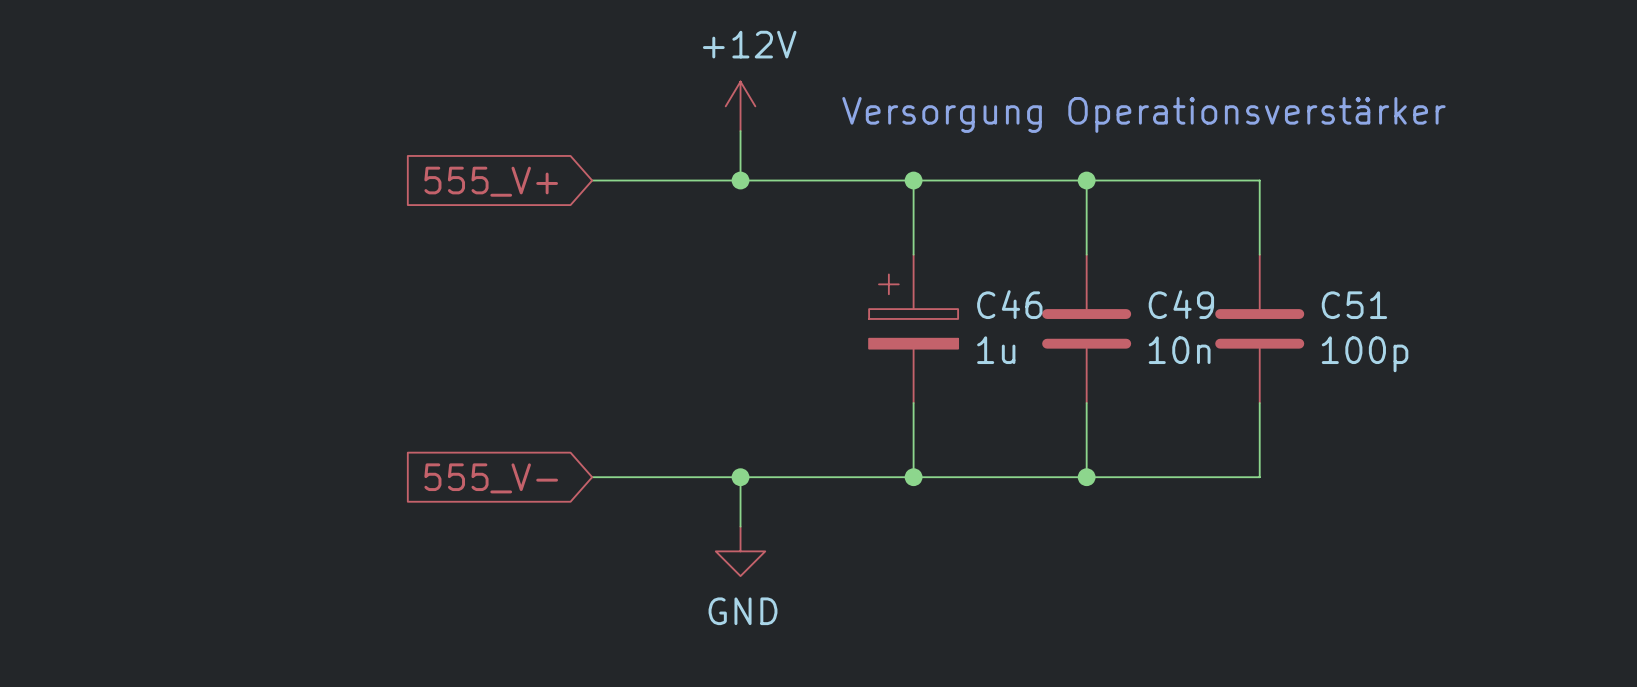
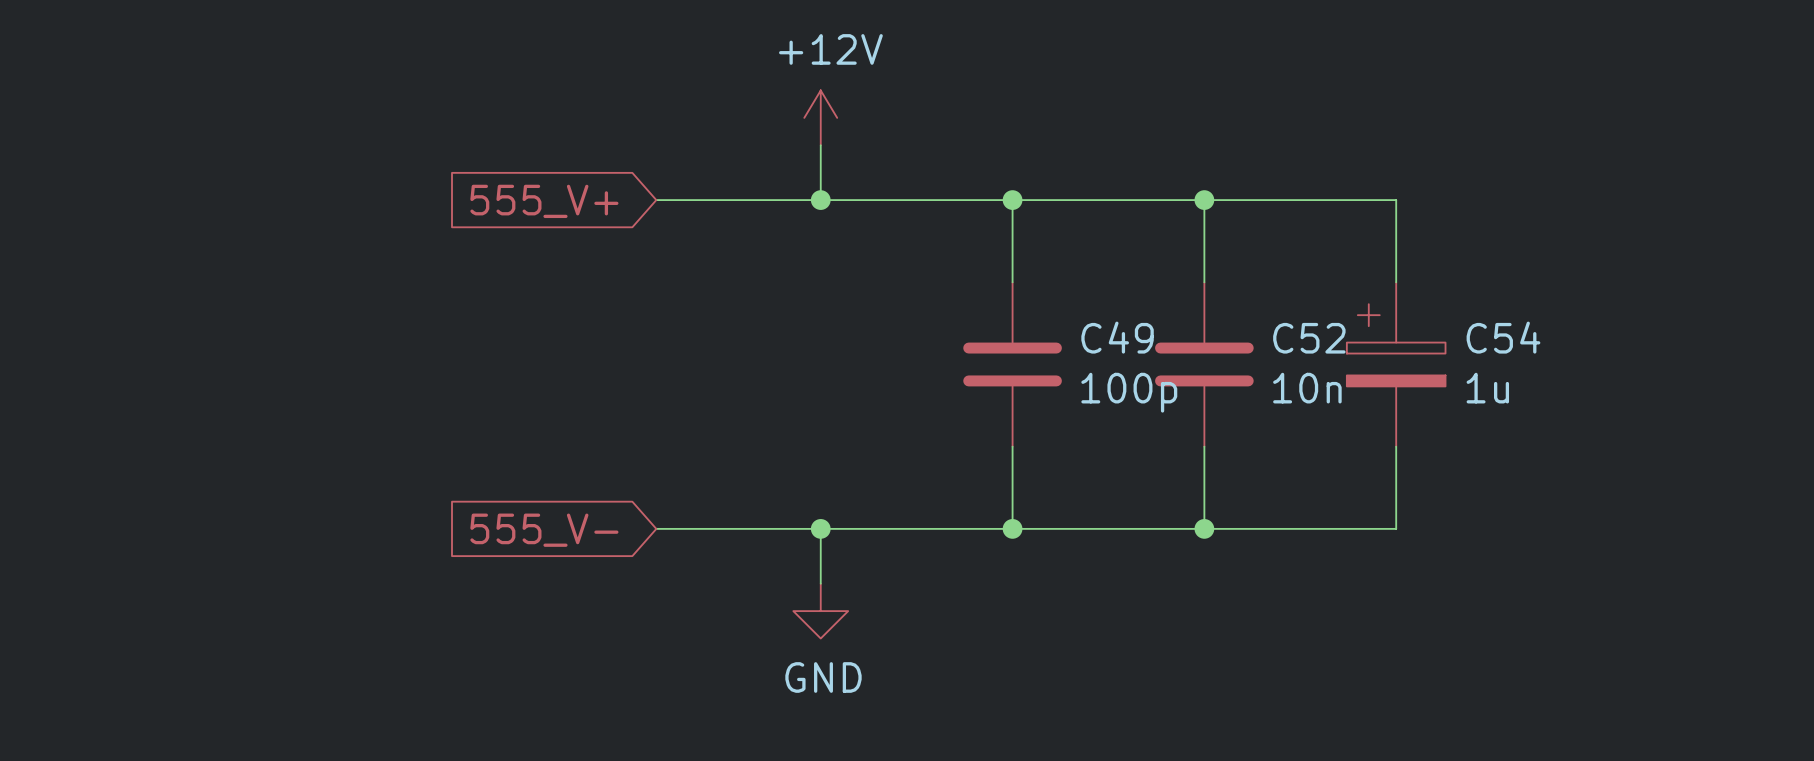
text: Versorgung Operationsverstärker (1143, 114) -> none
C49 name: C49 (1181, 304) -> C52 (1309, 338)
C46: 1u (913, 328) -> none
C49: none -> 100p (1012, 364)
C51: 100p (1259, 328) -> none
C54: none -> 1u (1396, 364)

